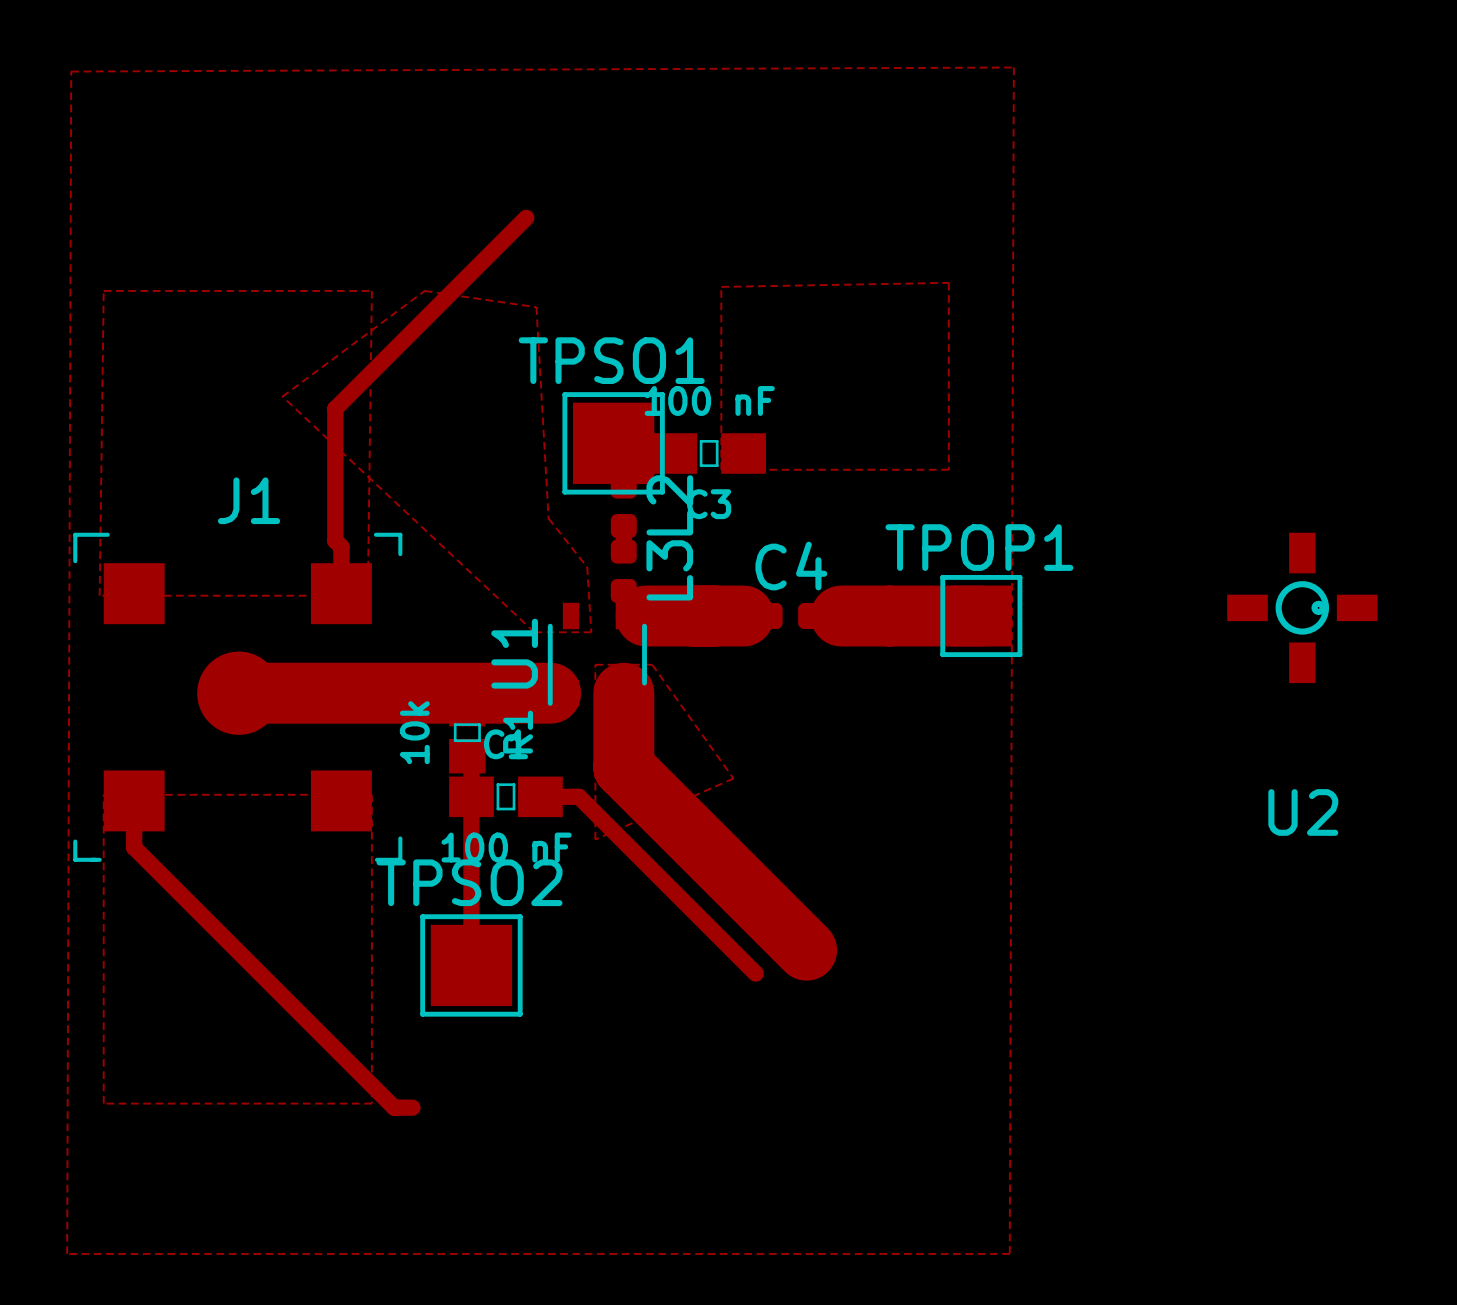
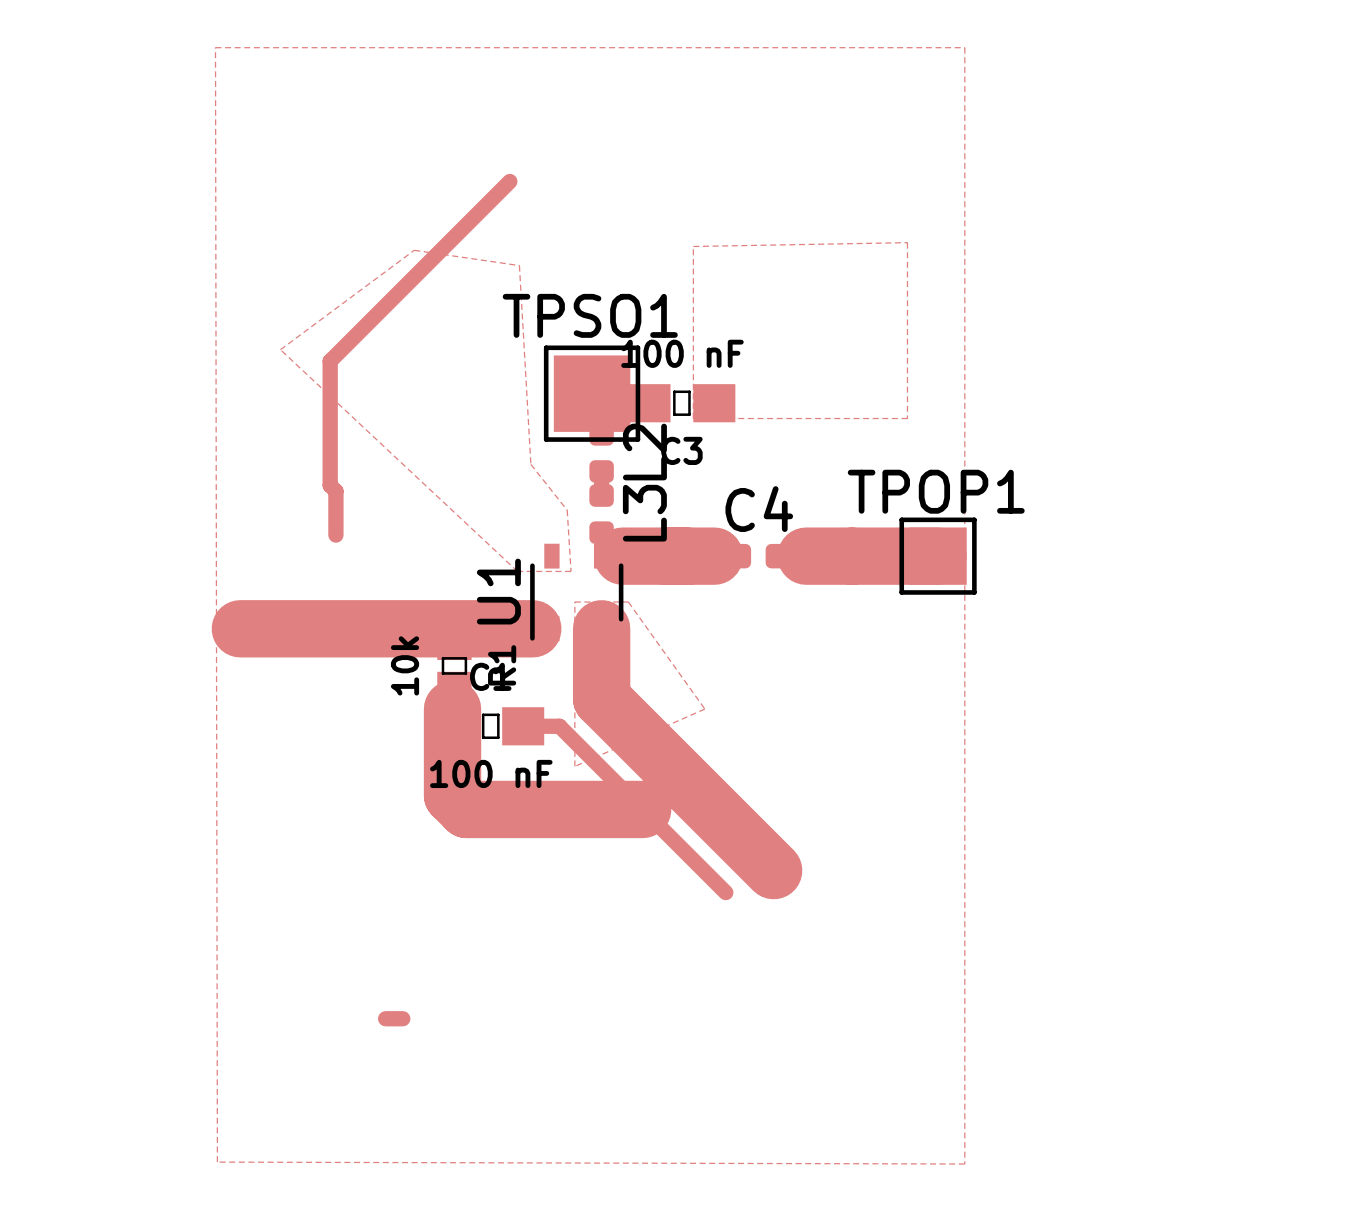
top zone outline: (1013, 67) (71, 71) (67, 1253) (1009, 1253) (1013, 67) -> (215, 47) (217, 1162) (964, 1164) (964, 47) (215, 47)
top zone outline: (103, 290) (99, 595) (367, 595) (371, 290) (103, 290) -> none
U2: (1302, 607) -> none
J1: (237, 697) -> none
top track: none -> (452, 709) (452, 795) (466, 809) (642, 809)
top zone outline: (103, 794) (103, 1103) (371, 1103) (371, 794) (103, 794) -> none
top track: (134, 800) (134, 847) (394, 1107) -> none
TPSO2: (471, 965) -> none

